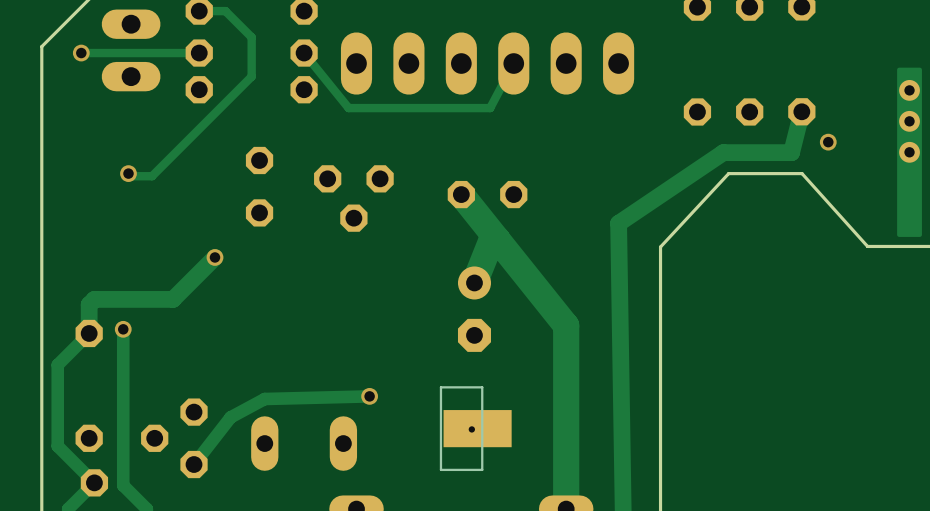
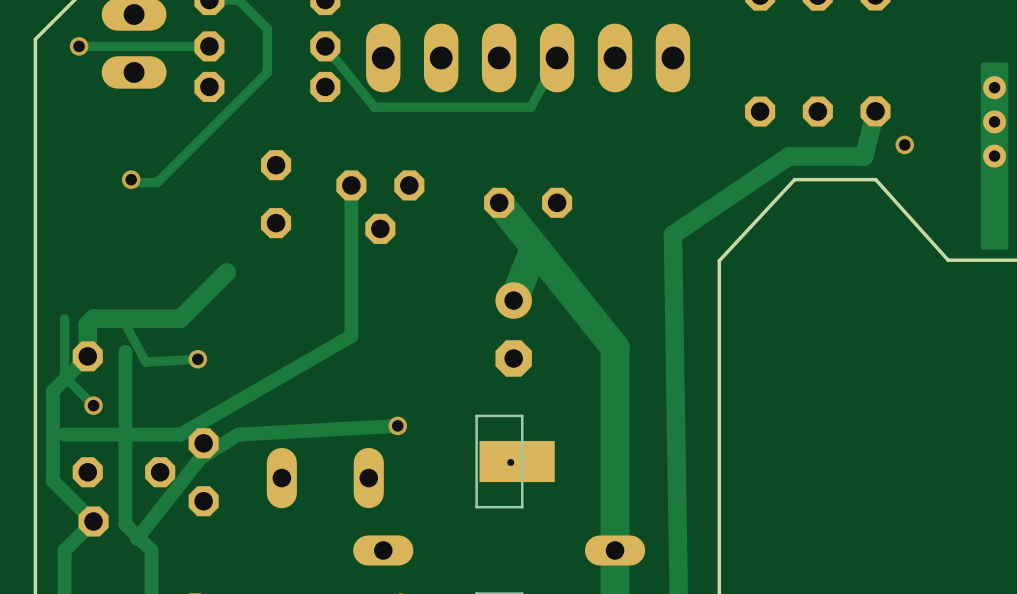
track: none -> (351, 185) (351, 336) (180, 434) (64, 434)
via: (214, 257) -> none
track: none -> (64, 318) (64, 376) (93, 405)
track: none -> (122, 318) (145, 362) (197, 359)
via: (123, 329) -> none
via: none -> (197, 359)
via: none -> (93, 405)
track: (369, 396) (264, 399) (230, 417) (194, 464) -> (397, 425) (238, 434) (200, 457) (137, 538)

